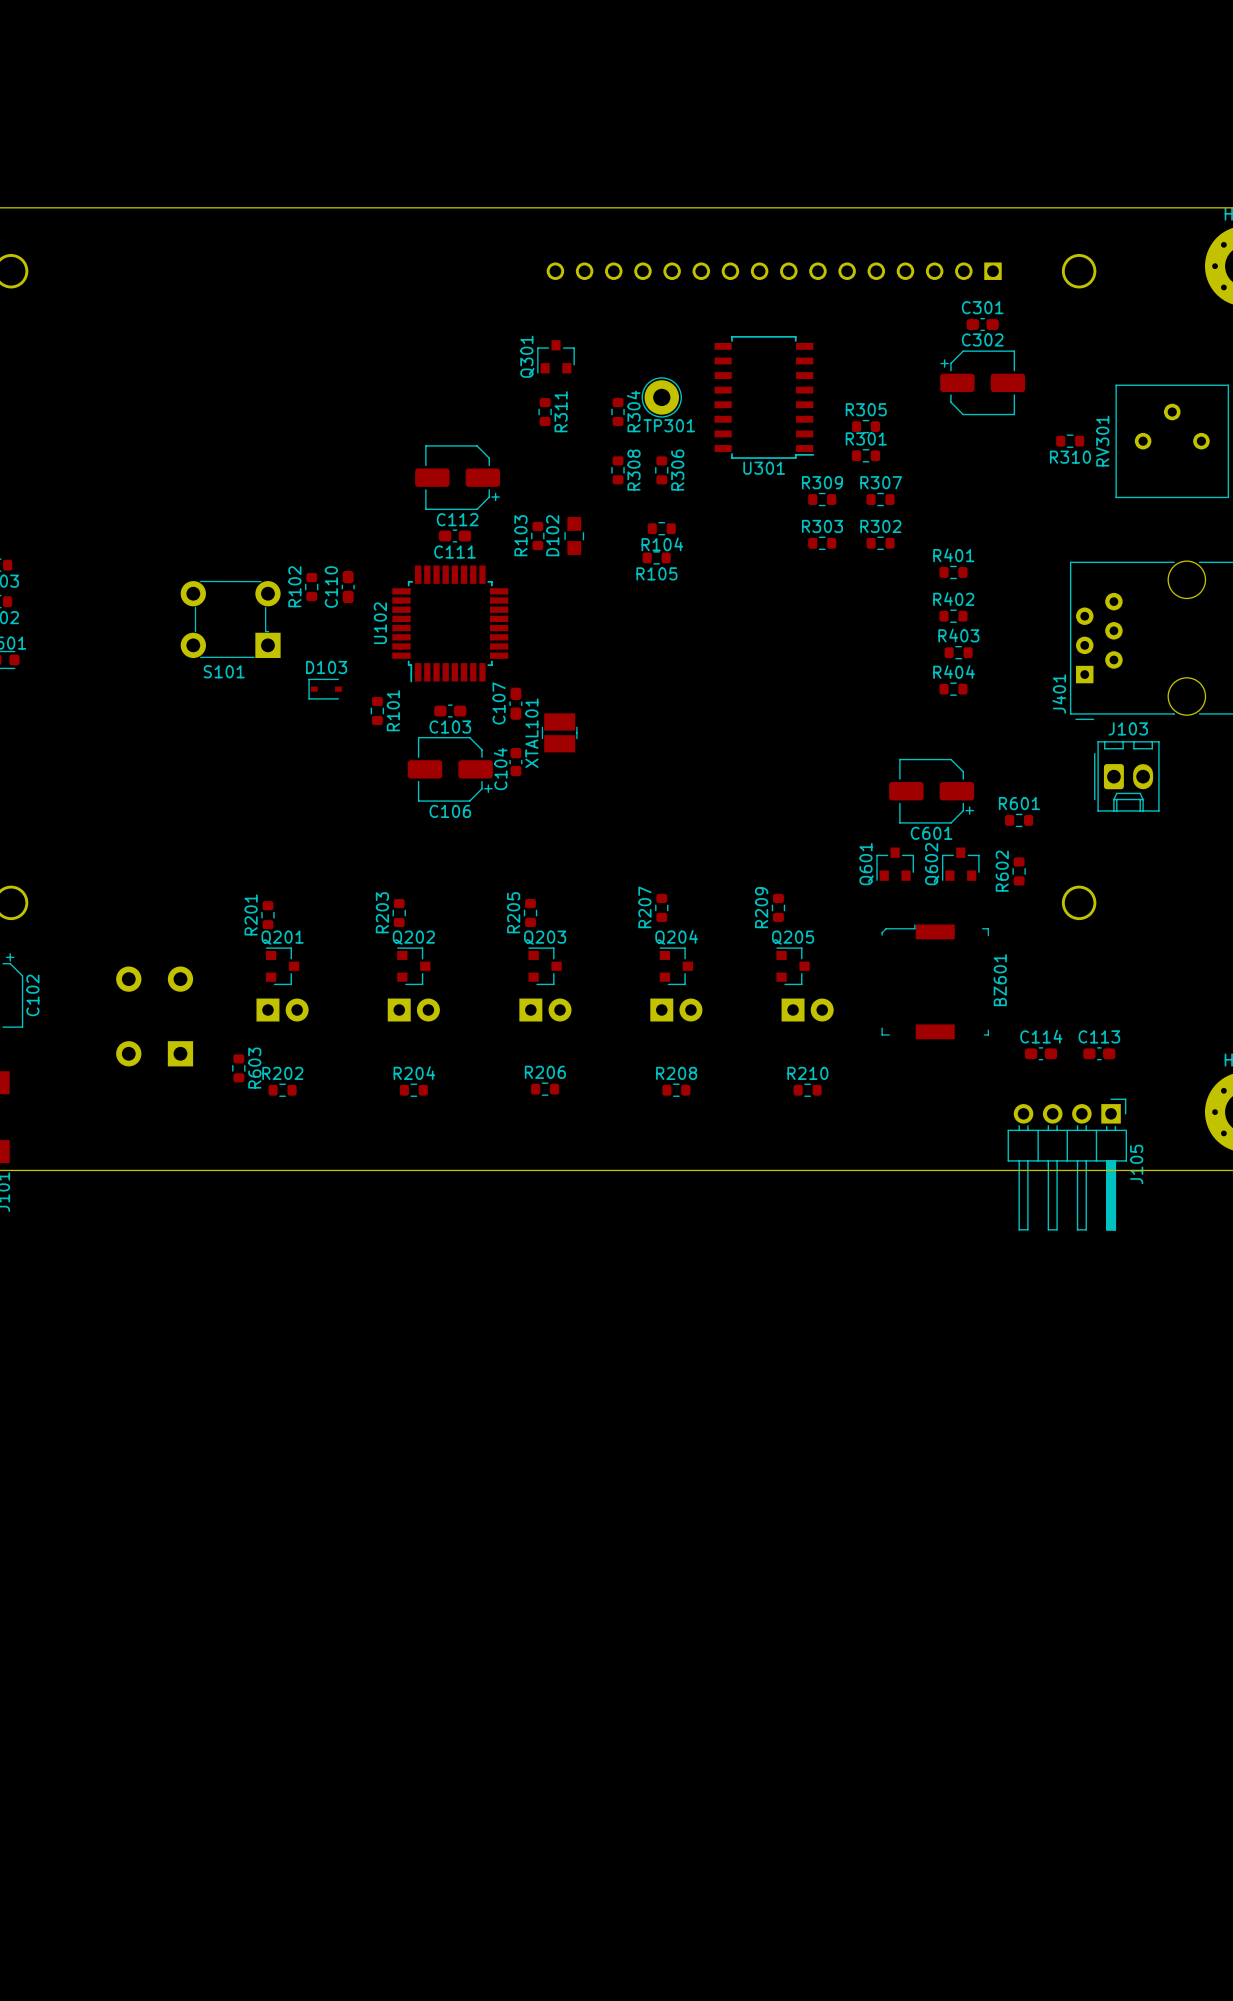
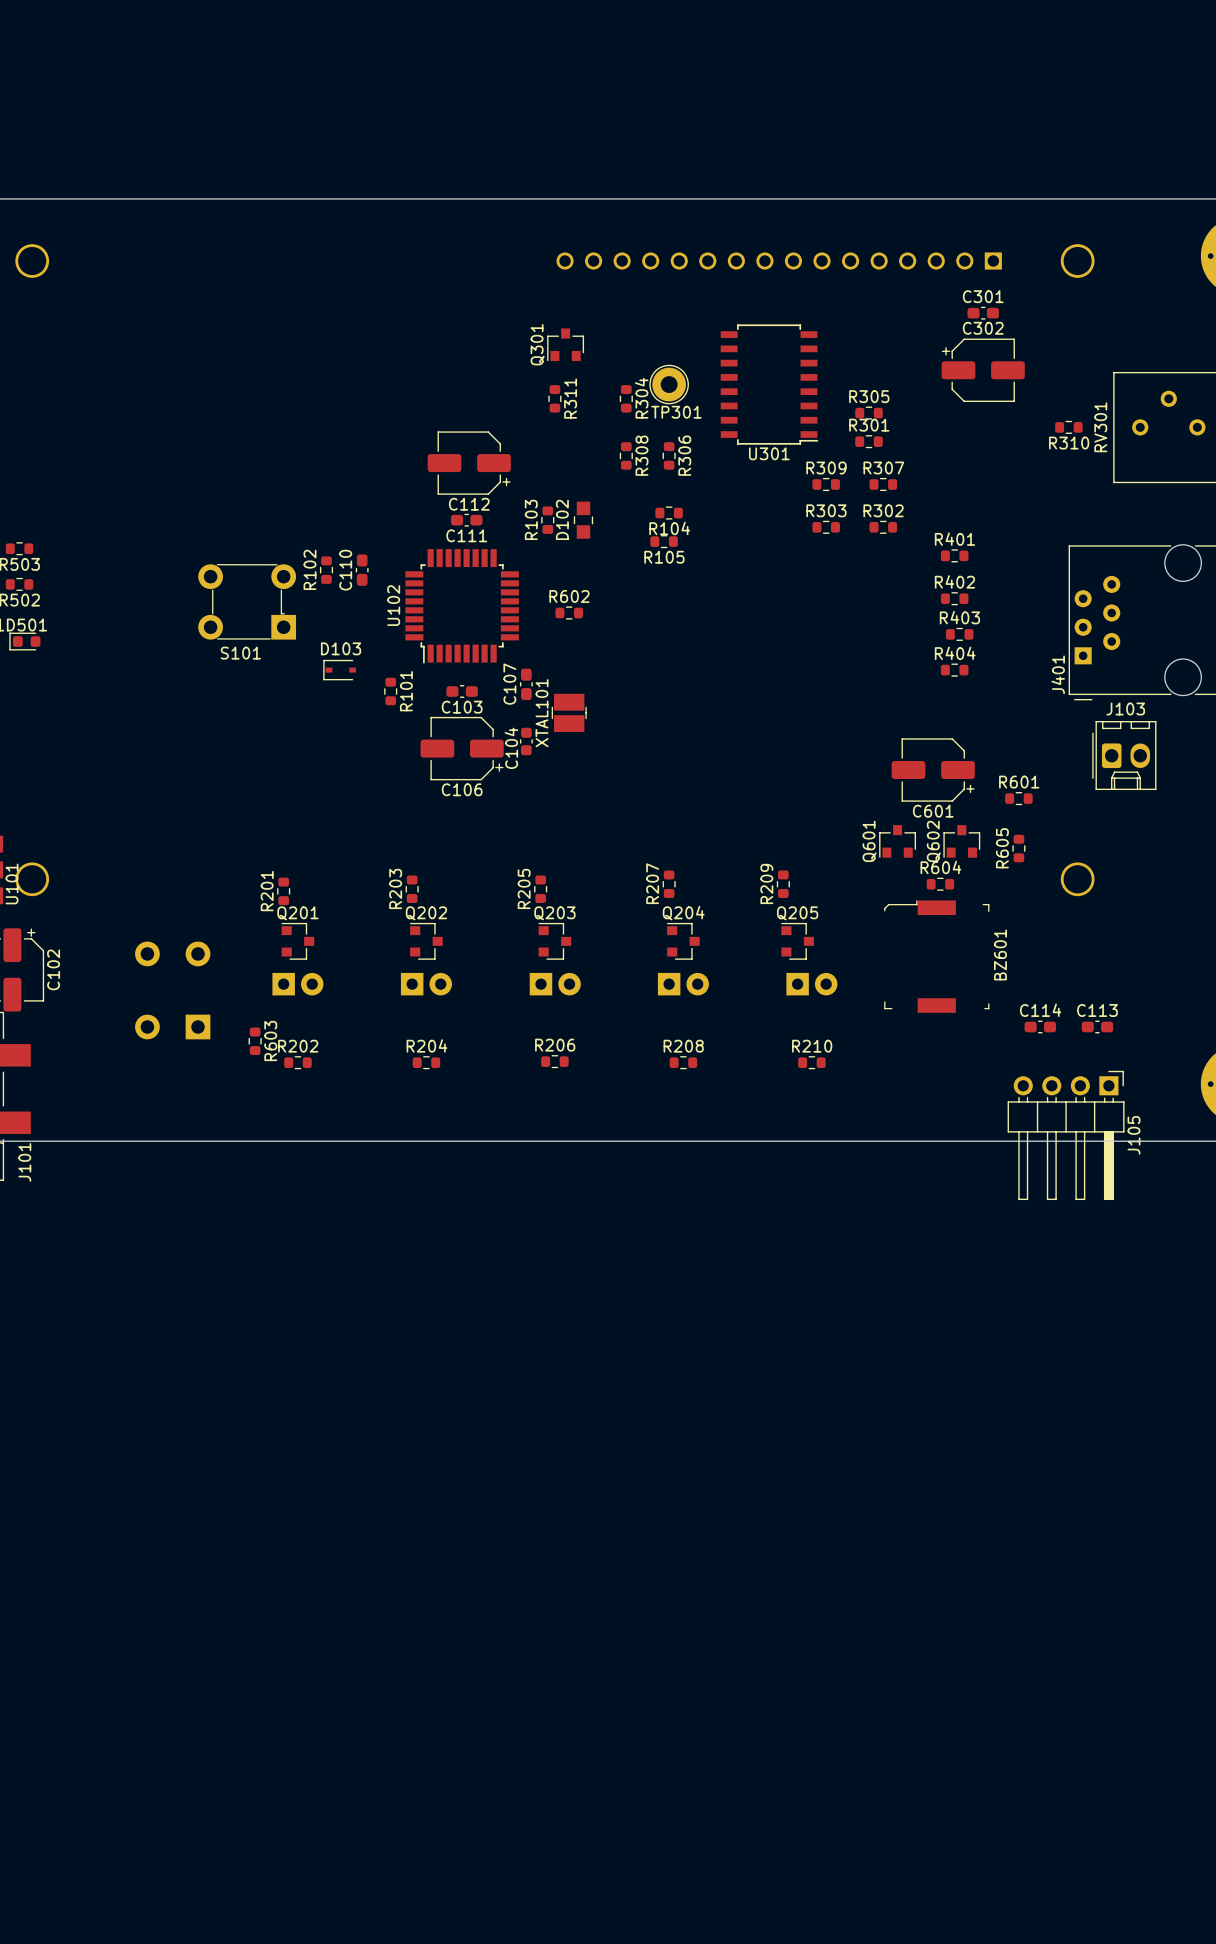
R602: none -> (569, 612)
R602 name: R602 (1002, 871) -> R605 (1002, 848)
R604: none -> (940, 884)

